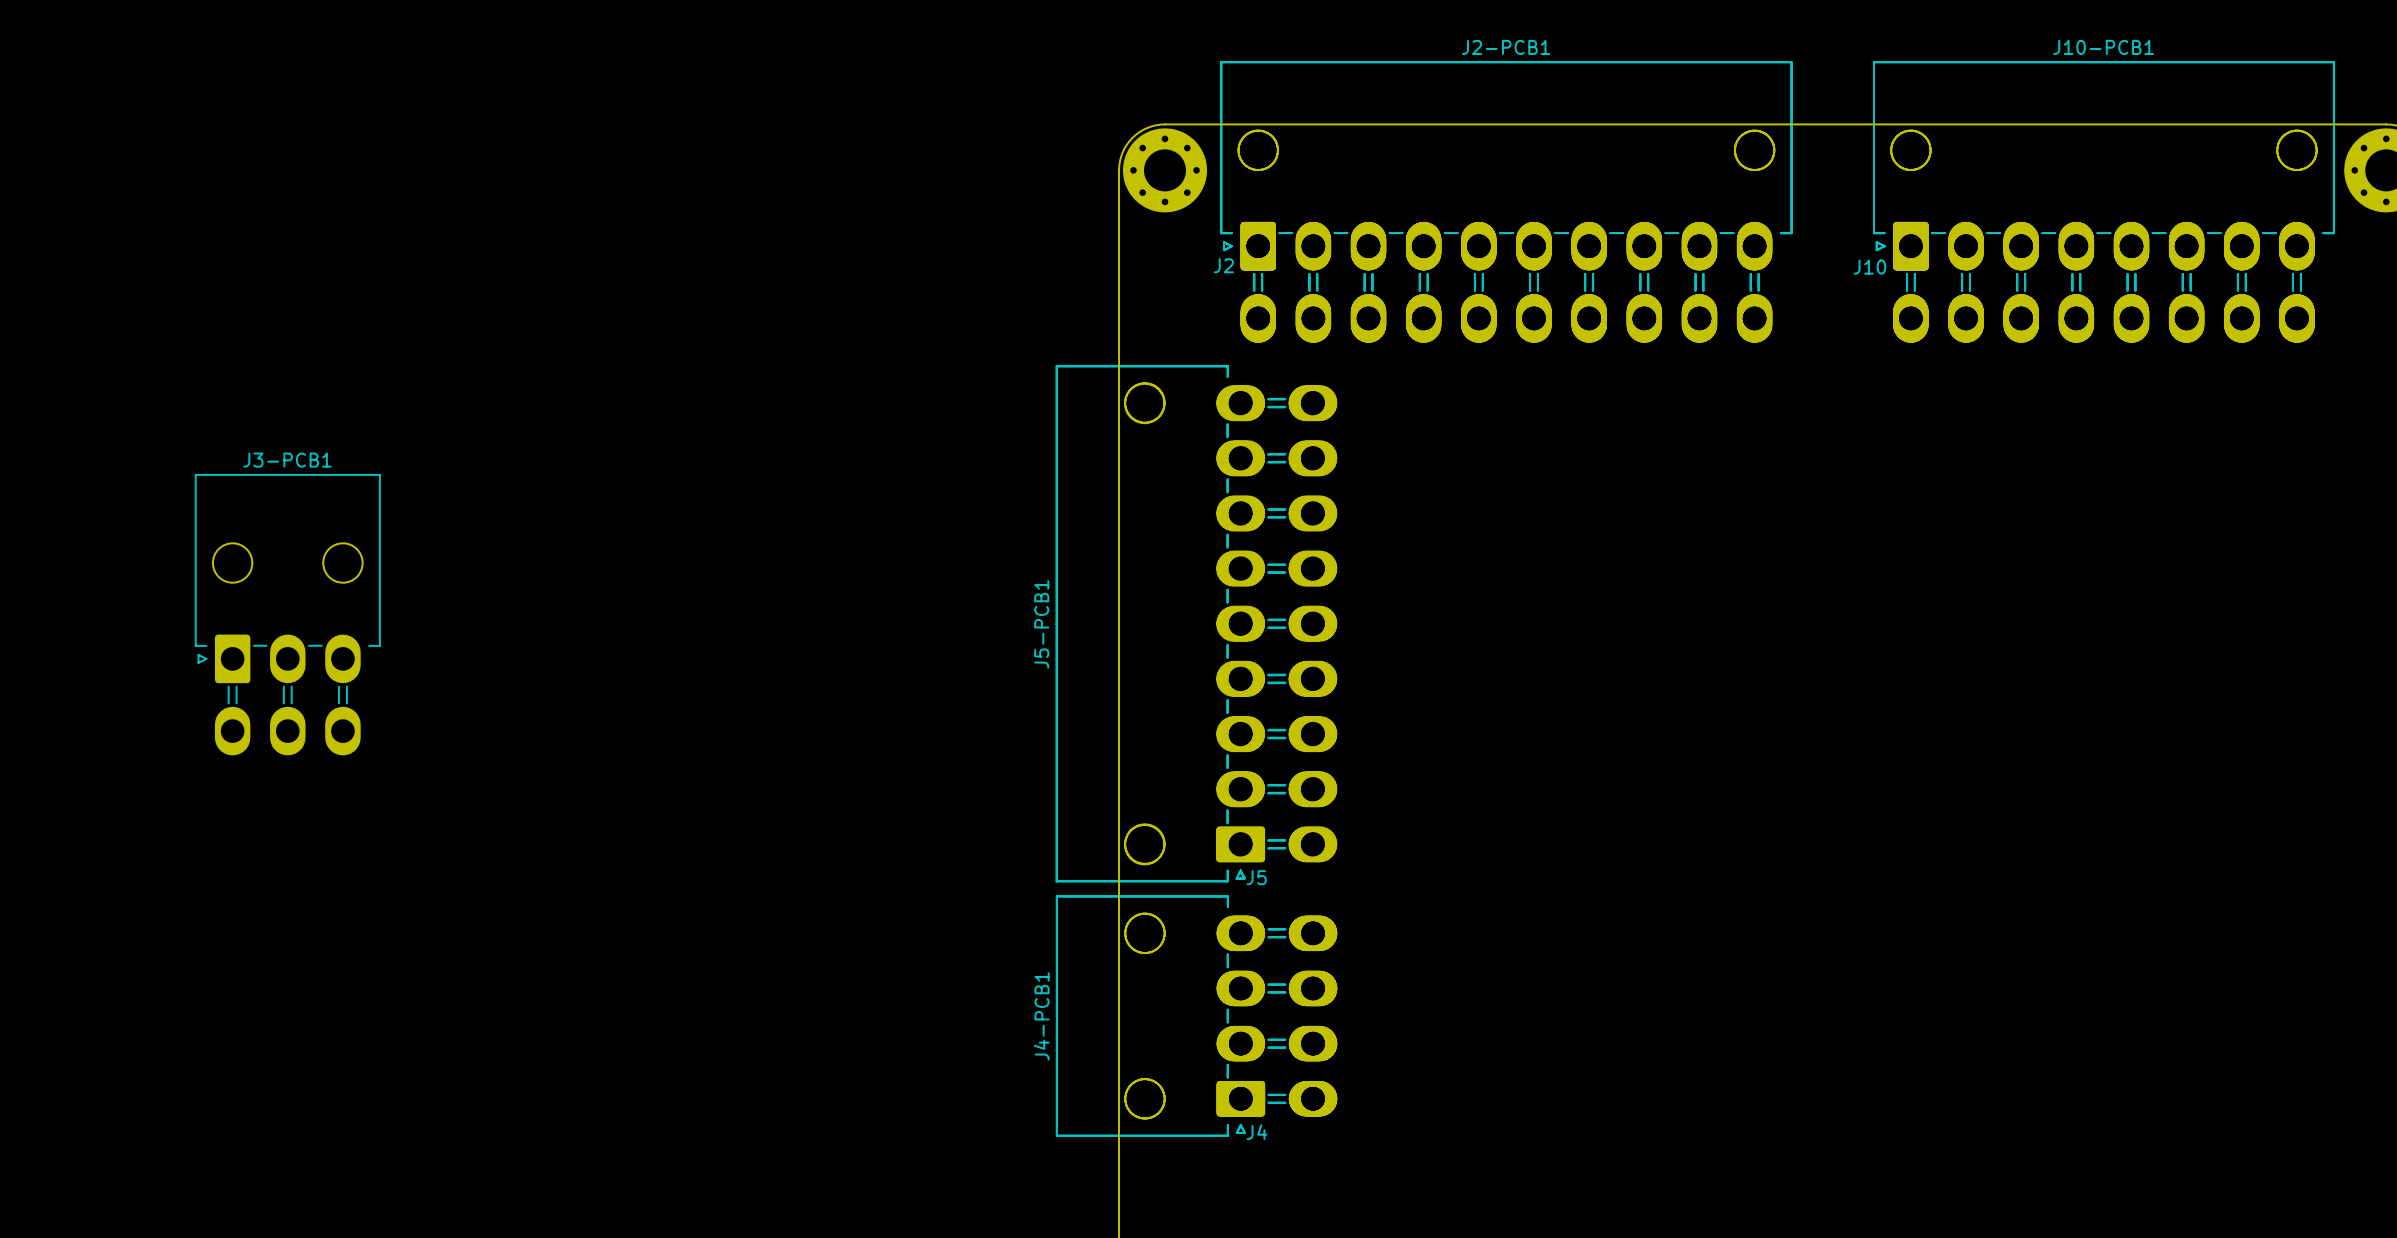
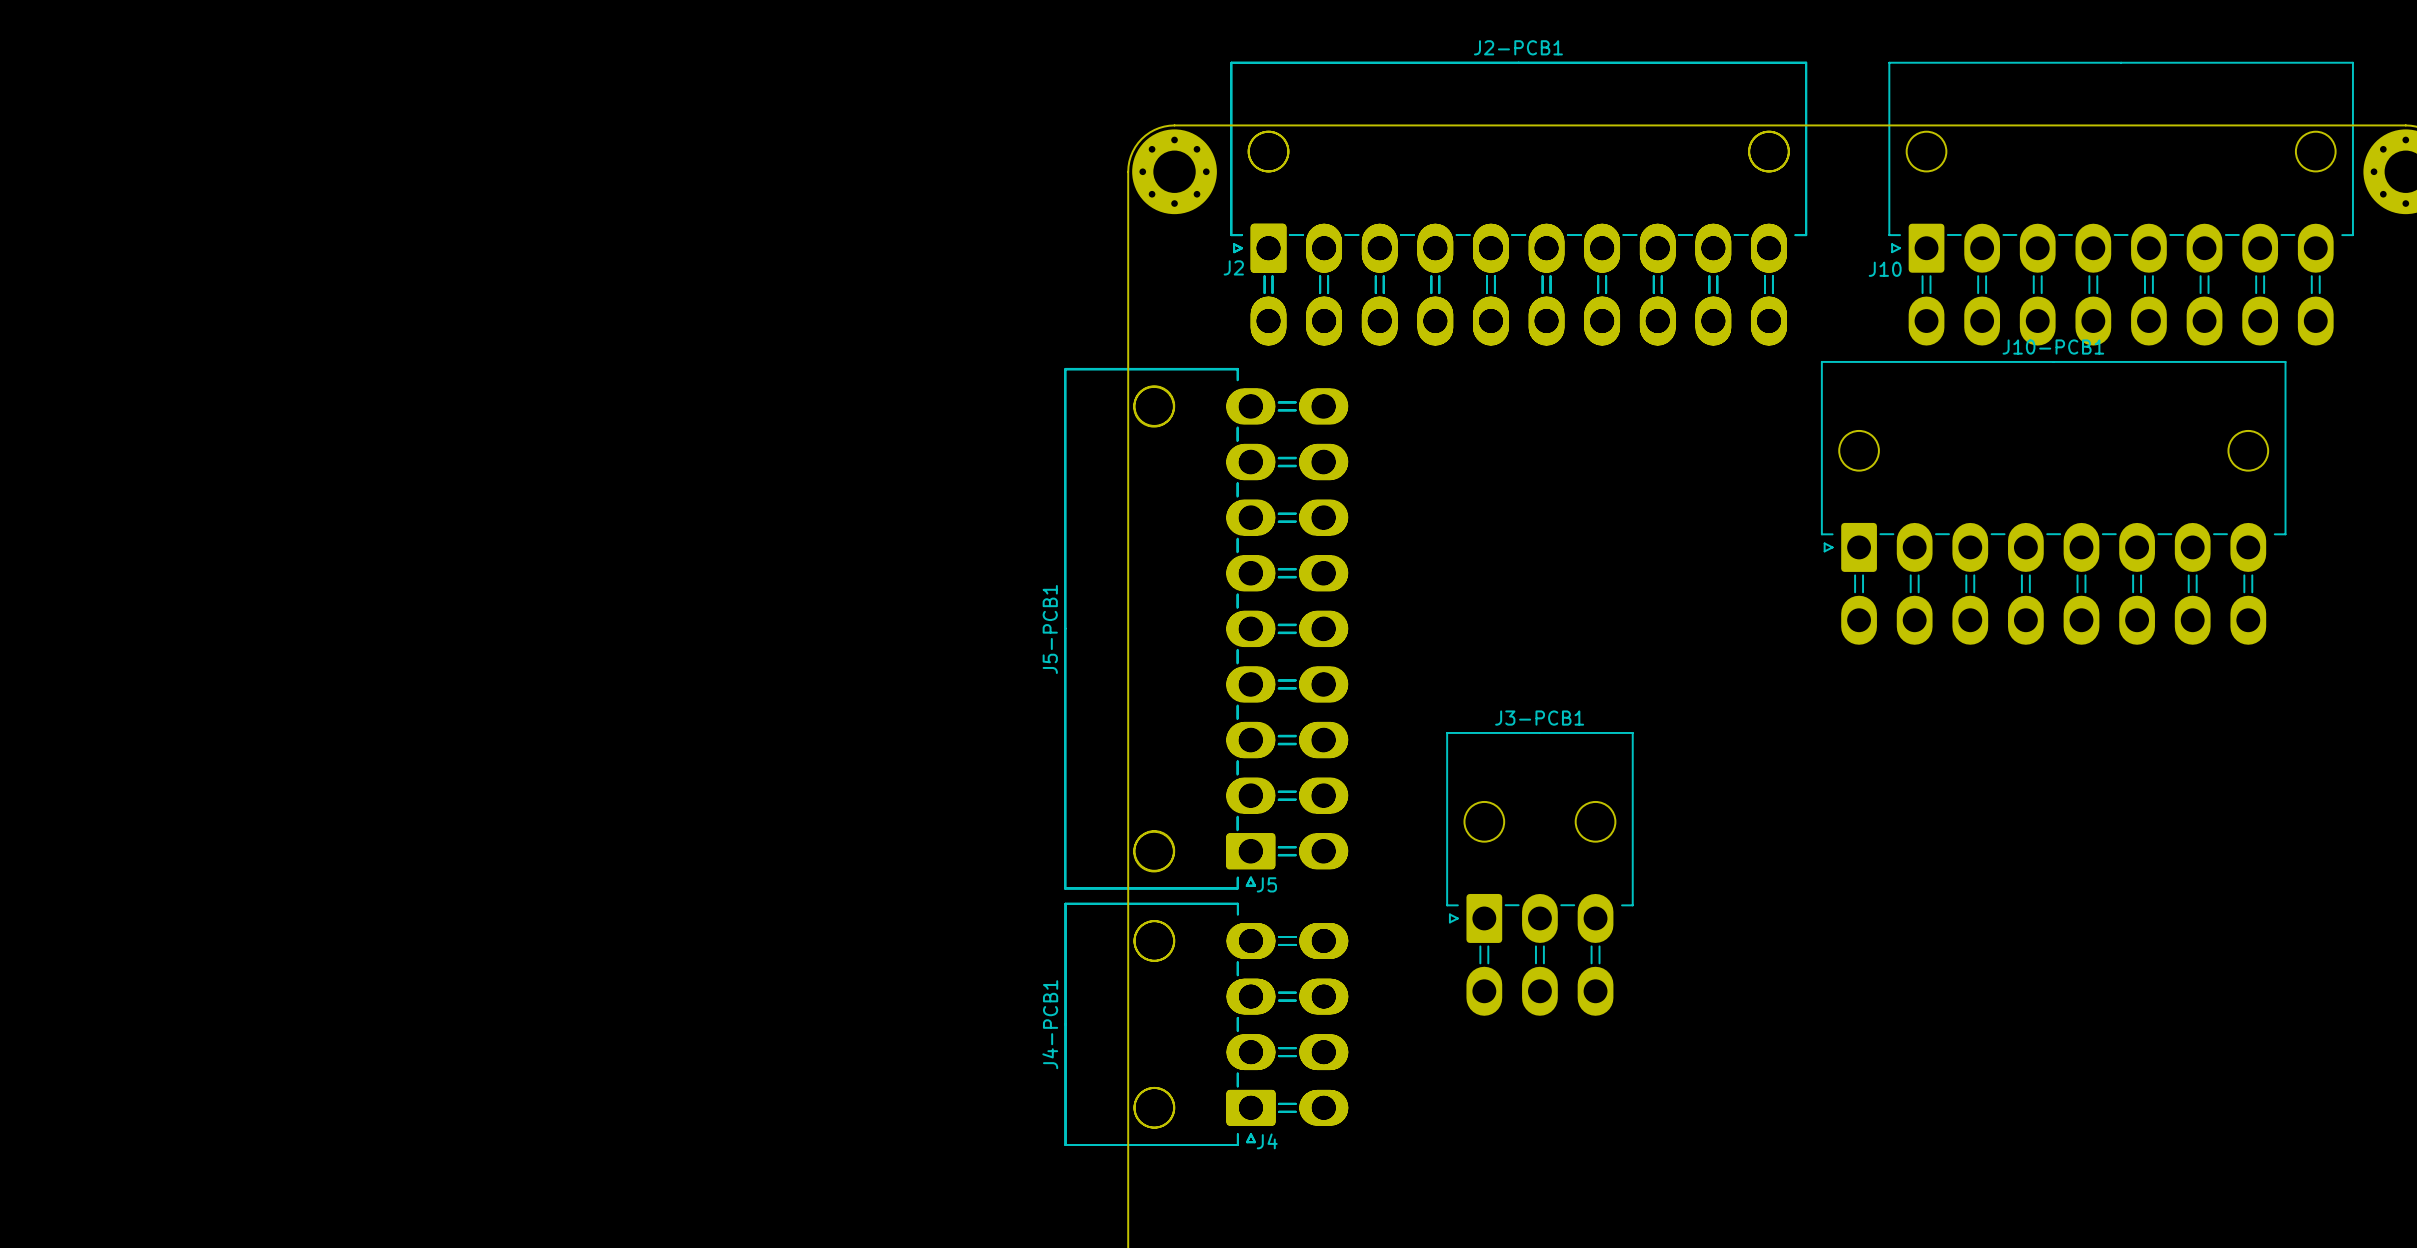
J10-PCB1 position: (2103, 202) -> (2053, 502)
J3-PCB1 position: (287, 614) -> (1539, 873)

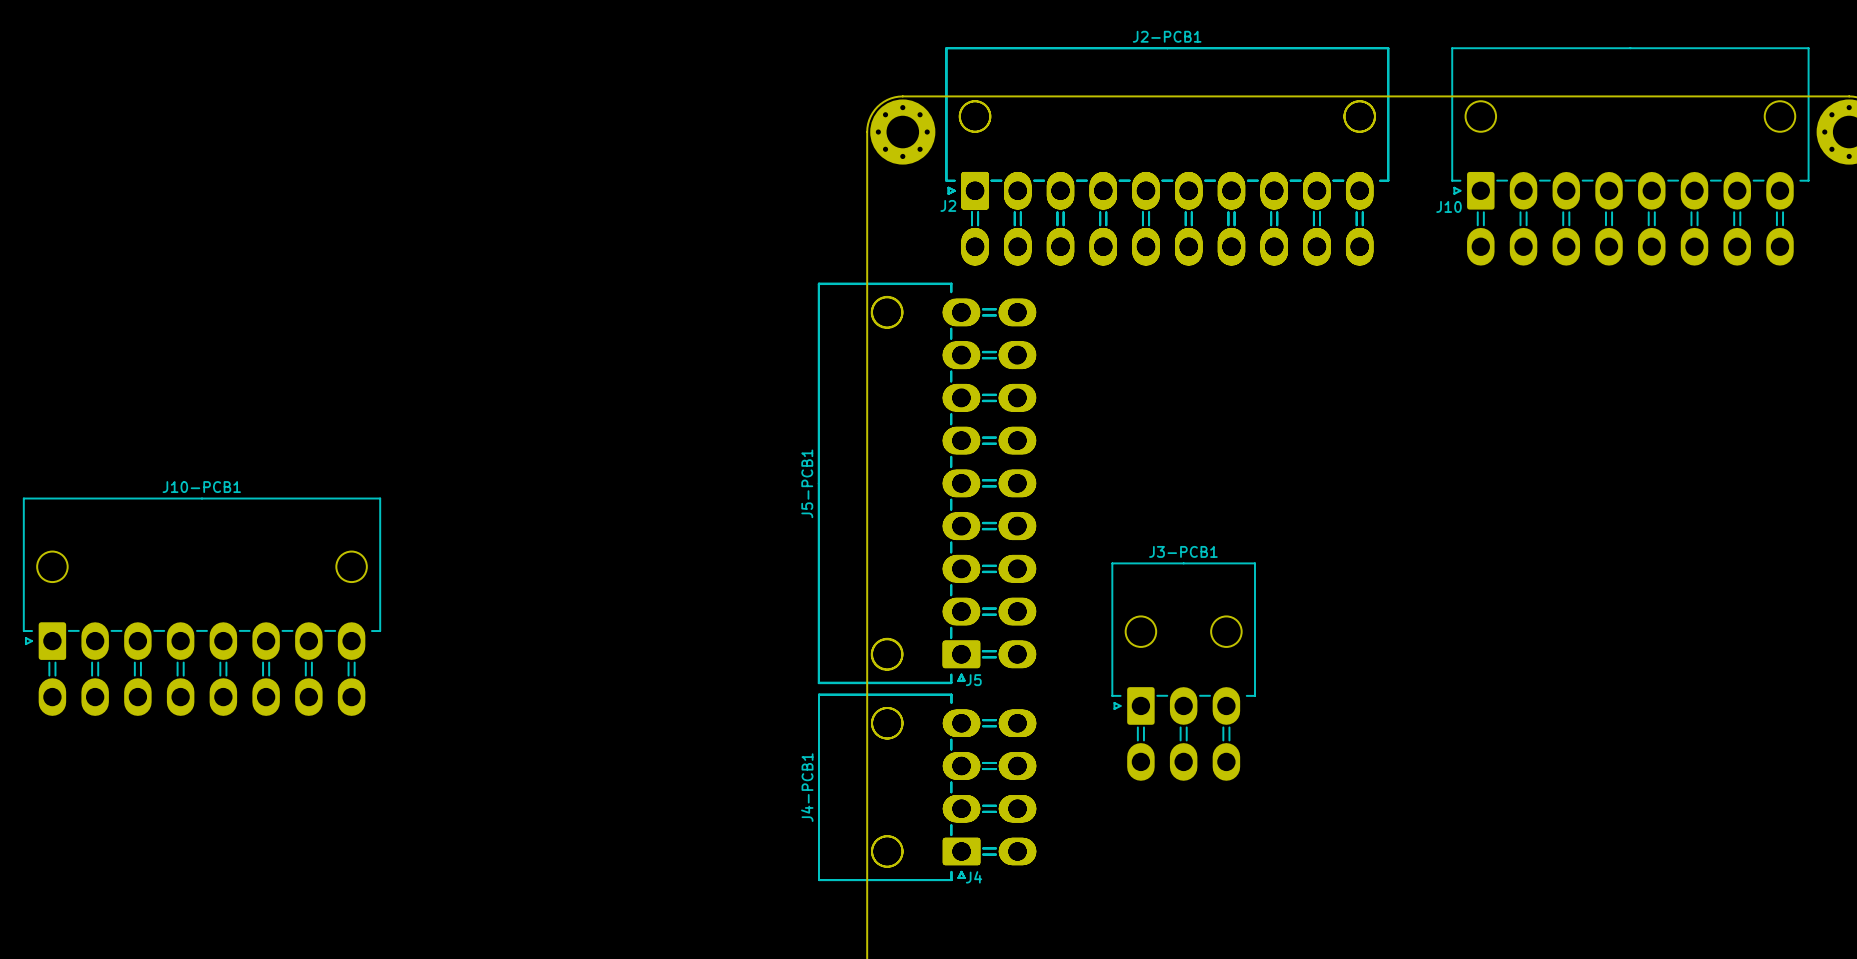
J10-PCB1 position: (2053, 502) -> (202, 606)

